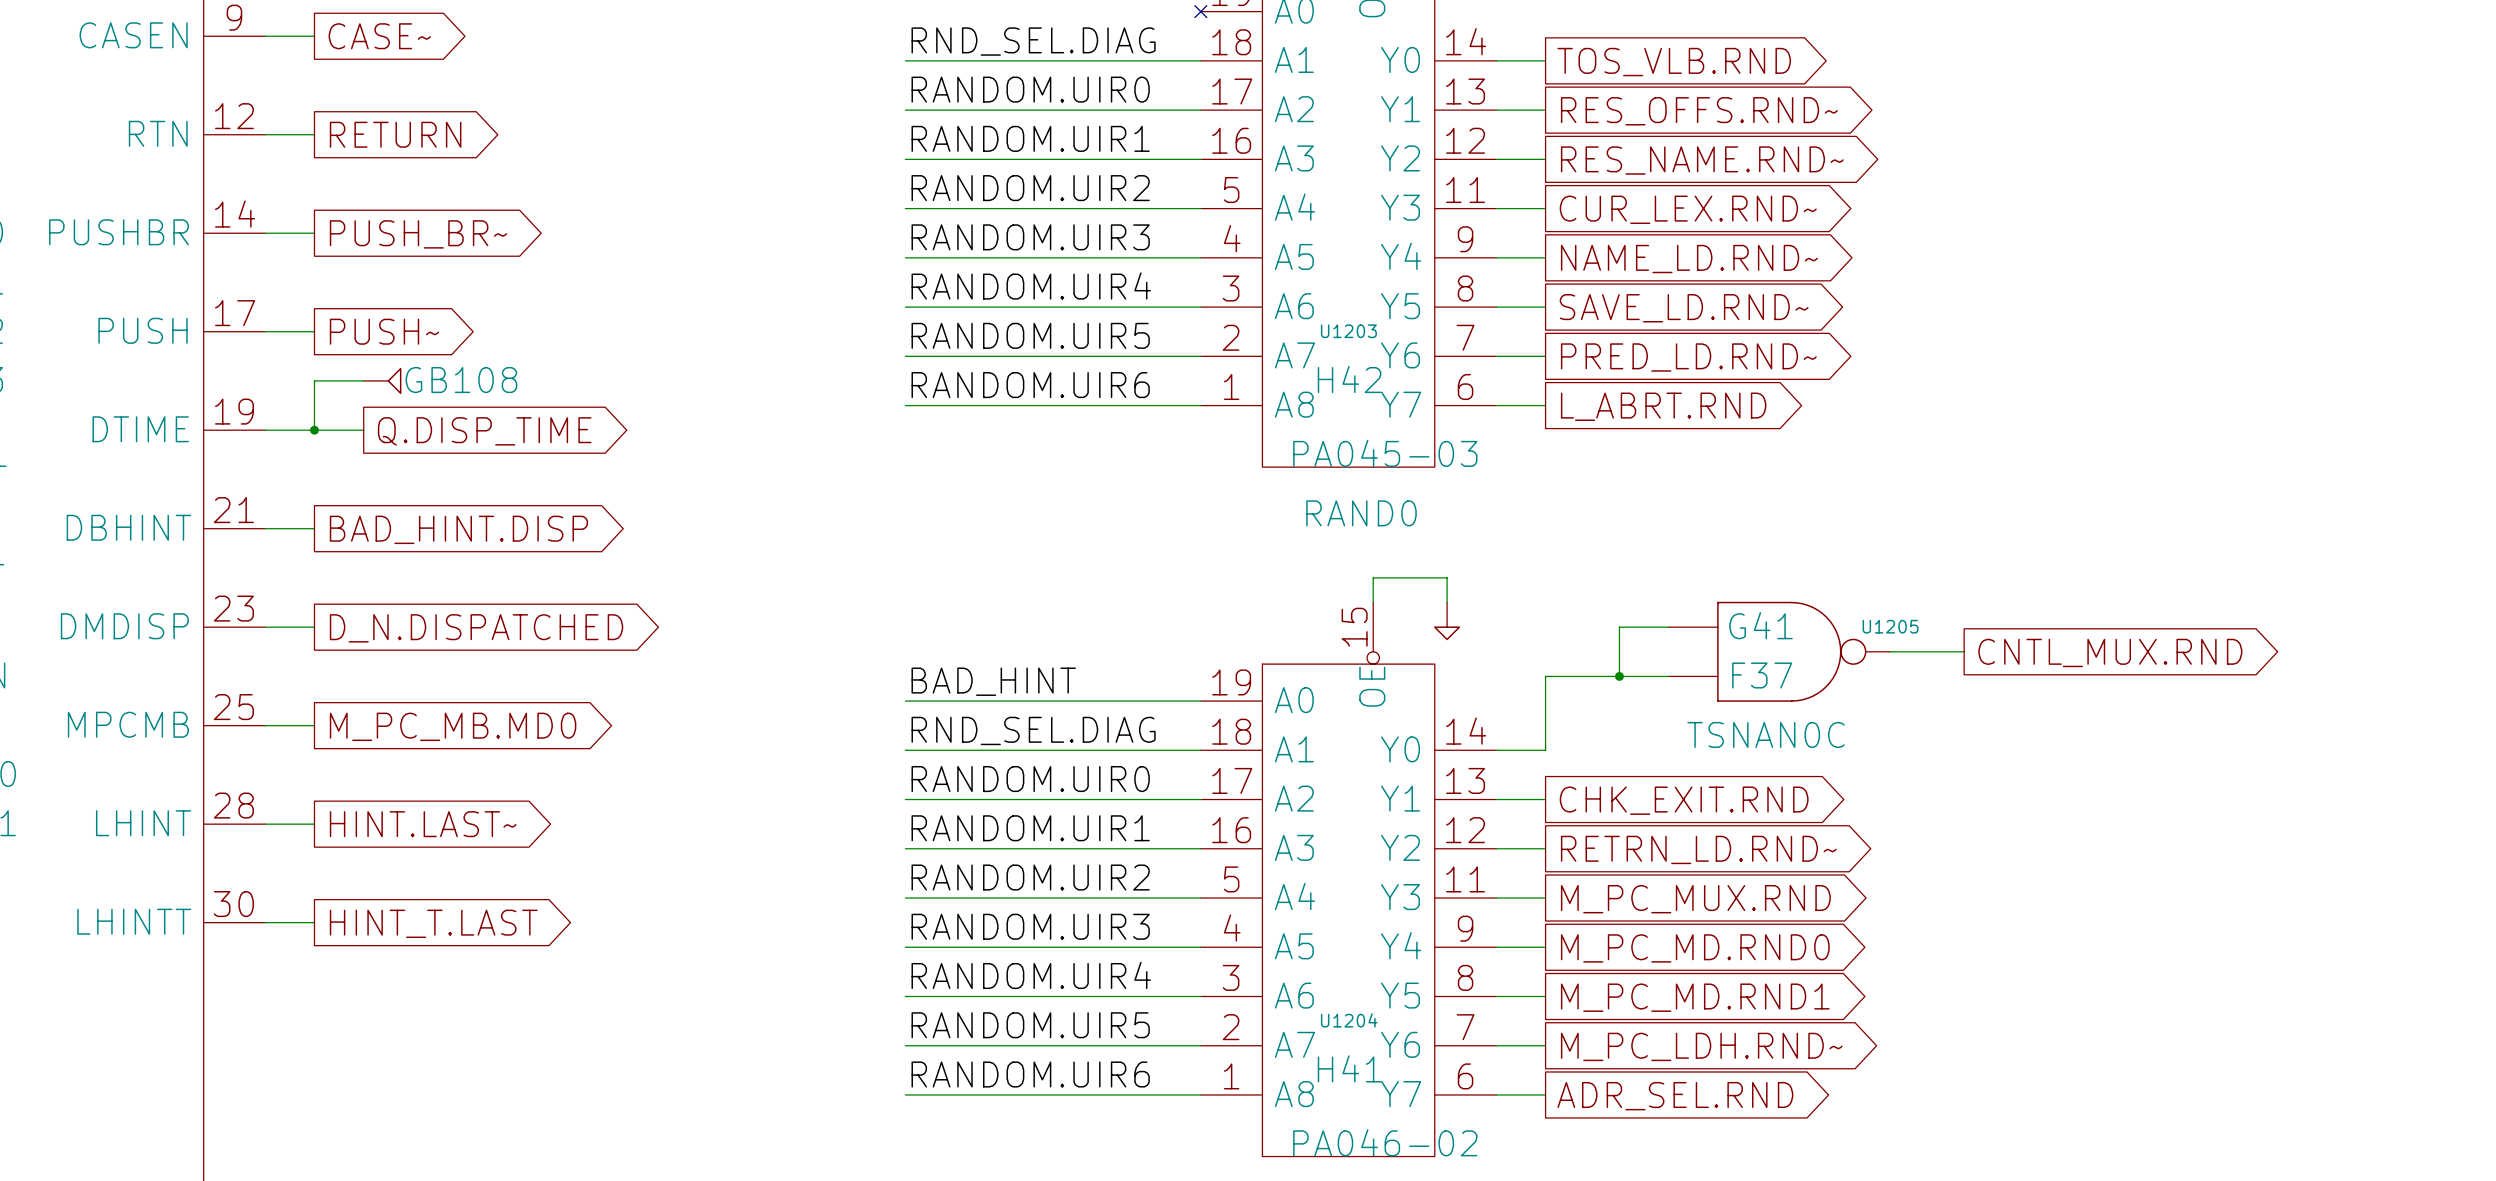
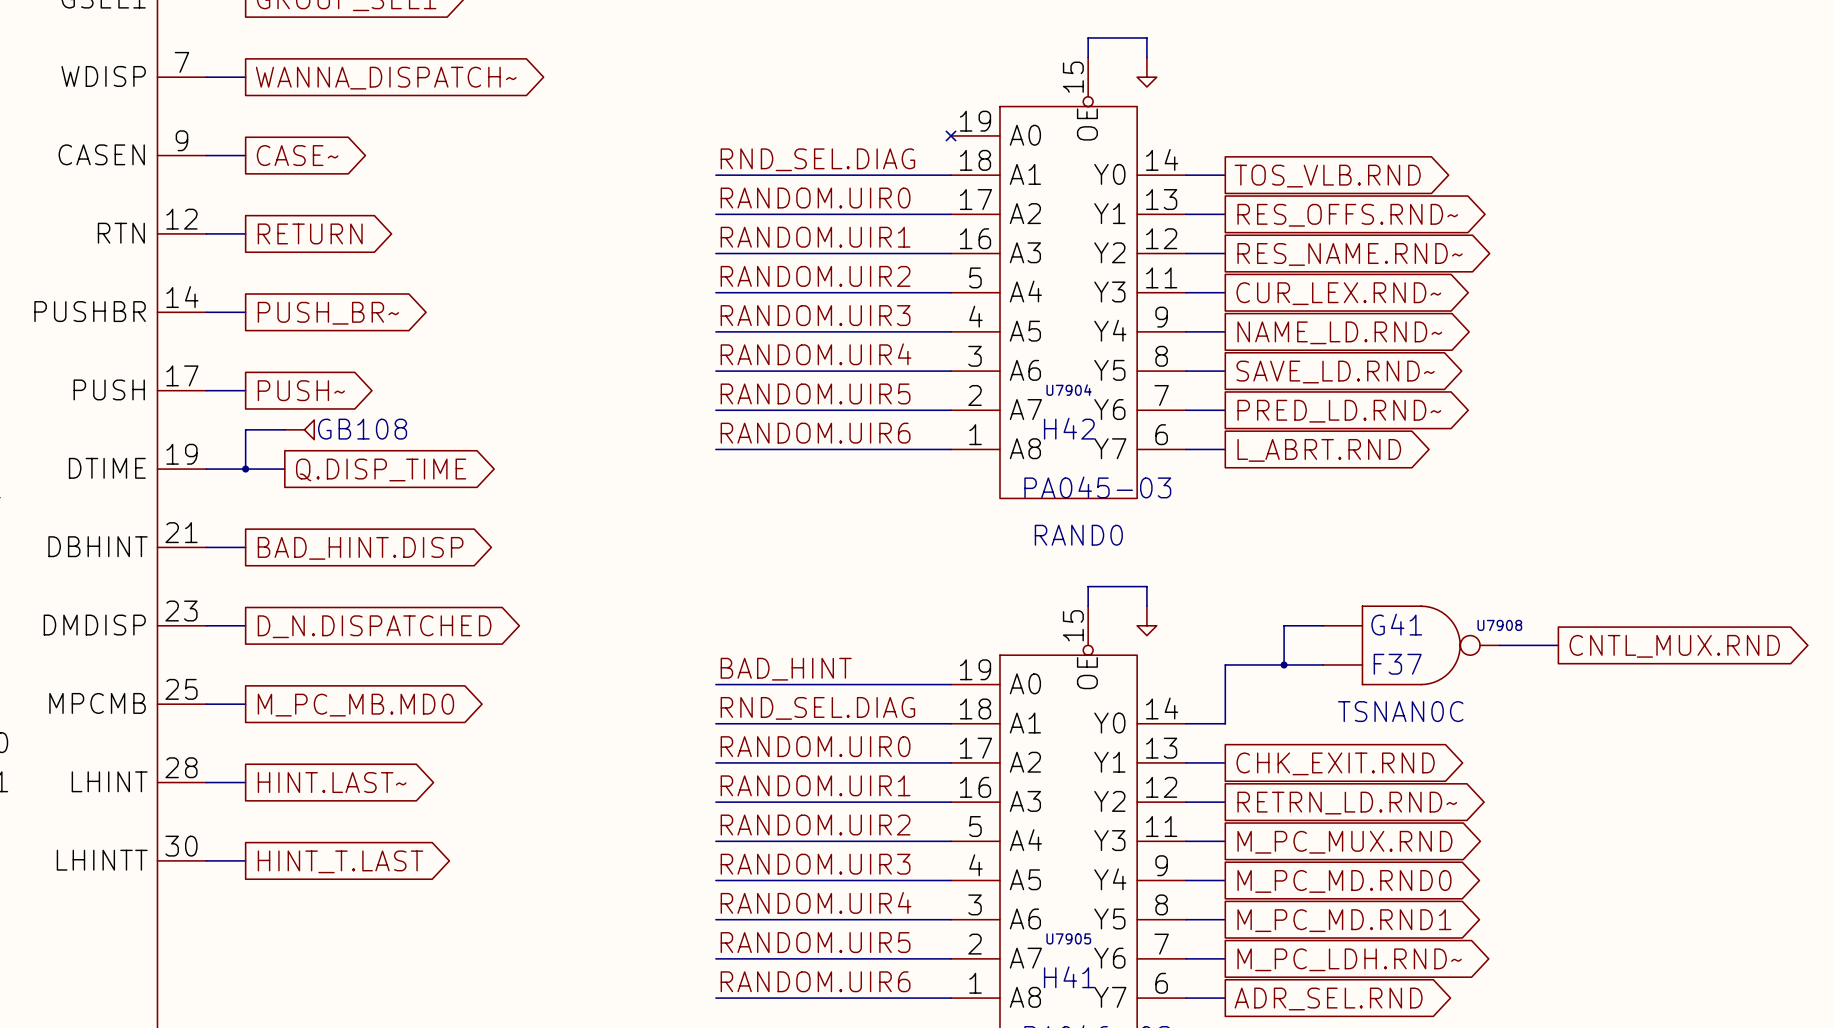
U1203 name: U1203 (1348, 331) -> U7904 (1069, 390)
U1205 name: U1205 (1890, 626) -> U7908 (1499, 625)
U1204 name: U1204 (1349, 1020) -> U7905 (1068, 938)

